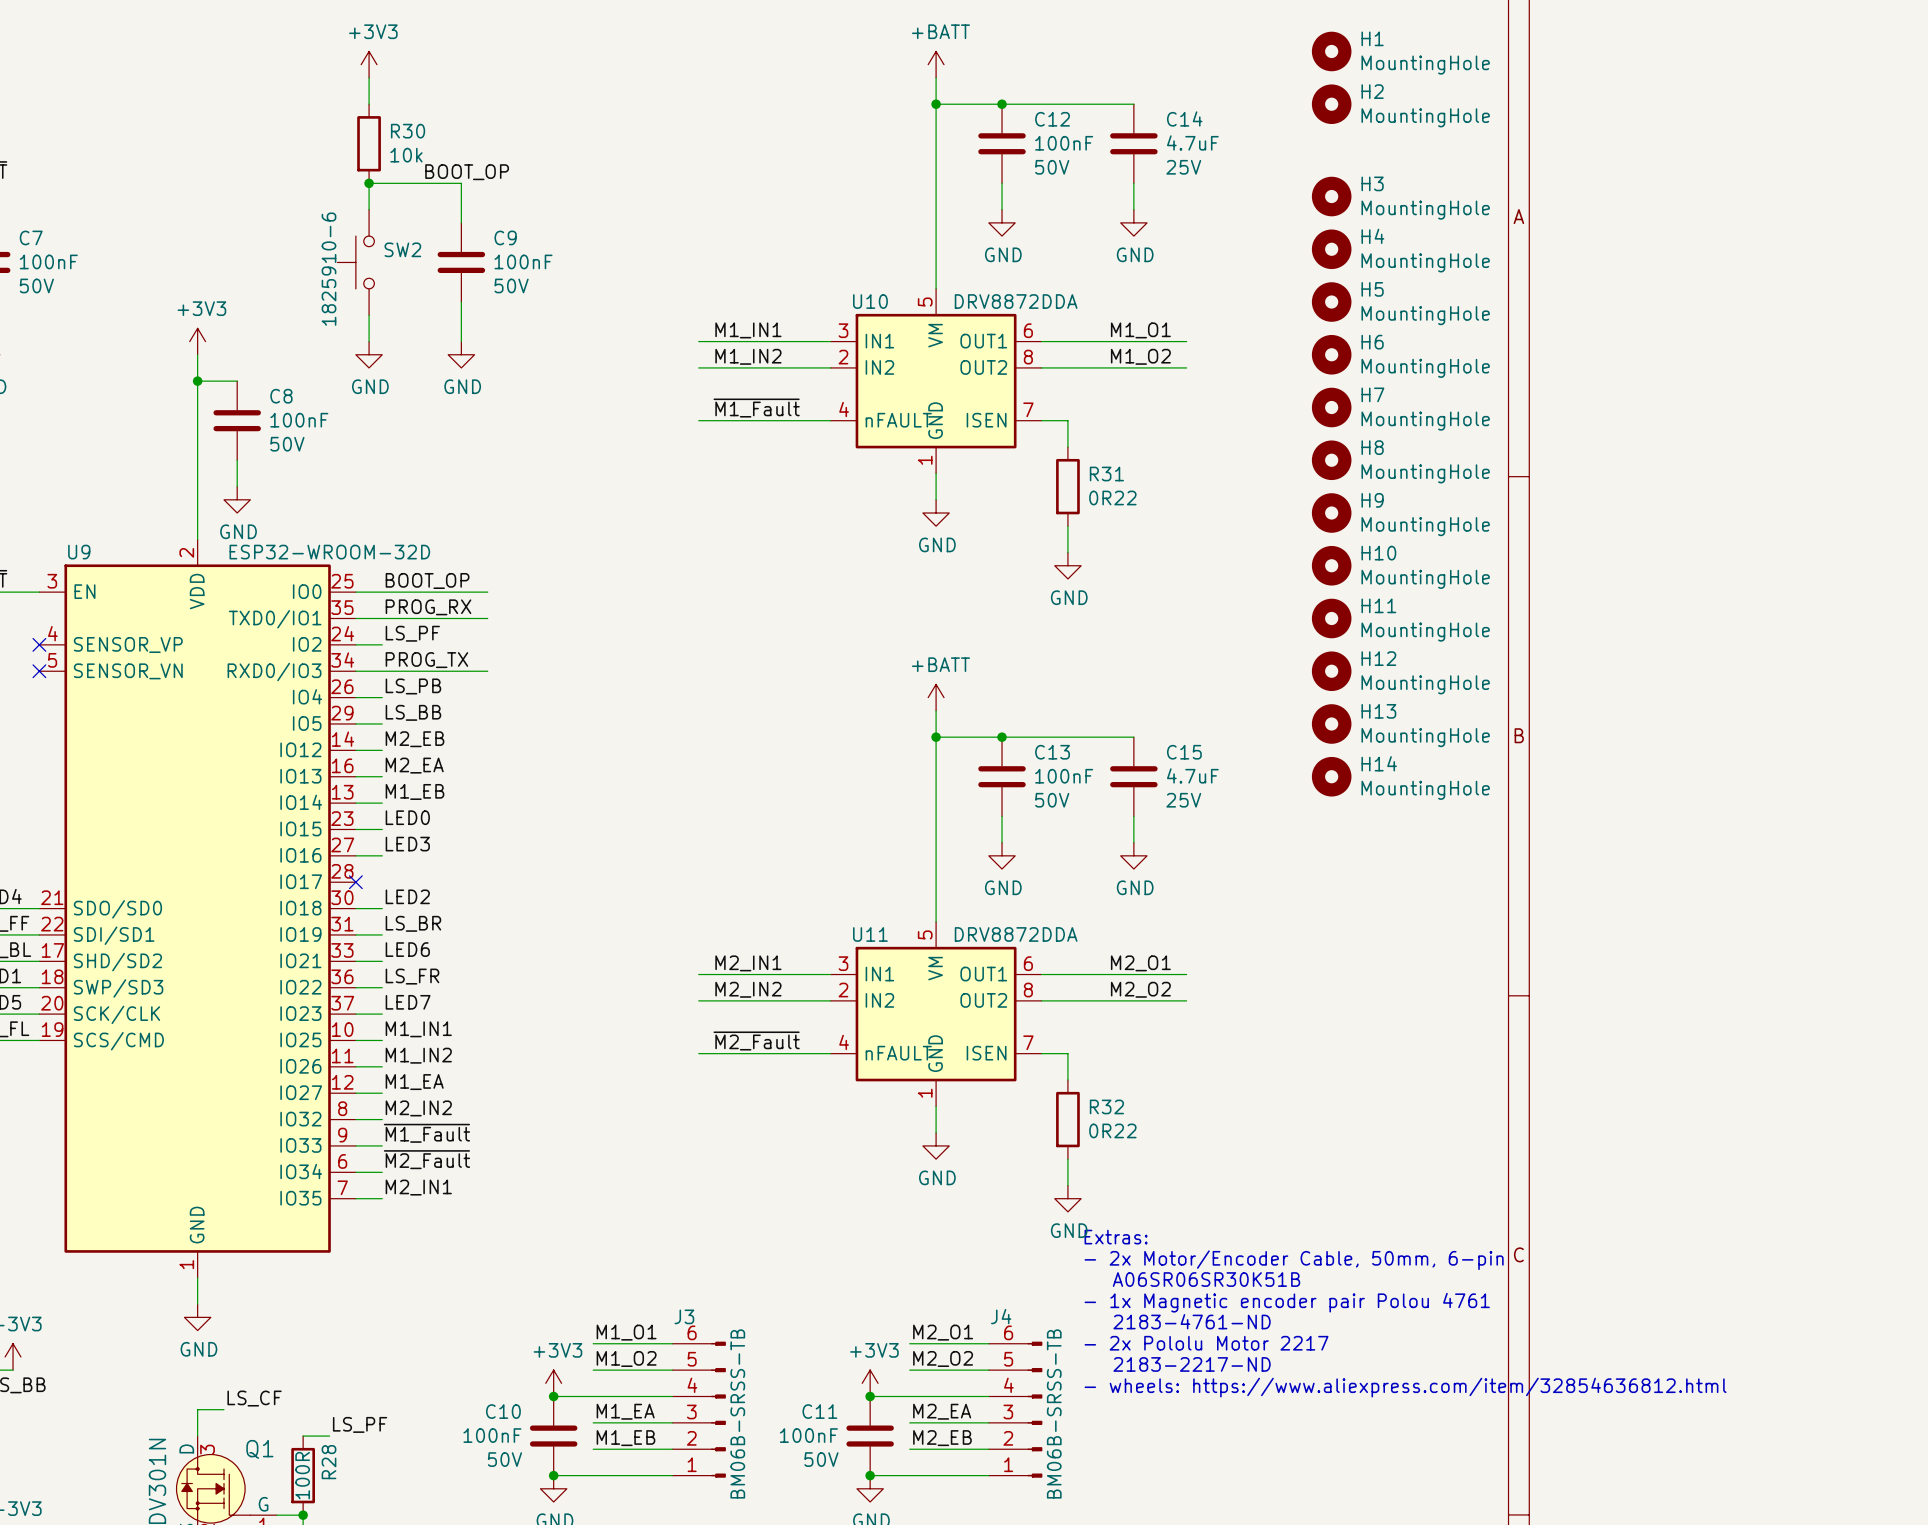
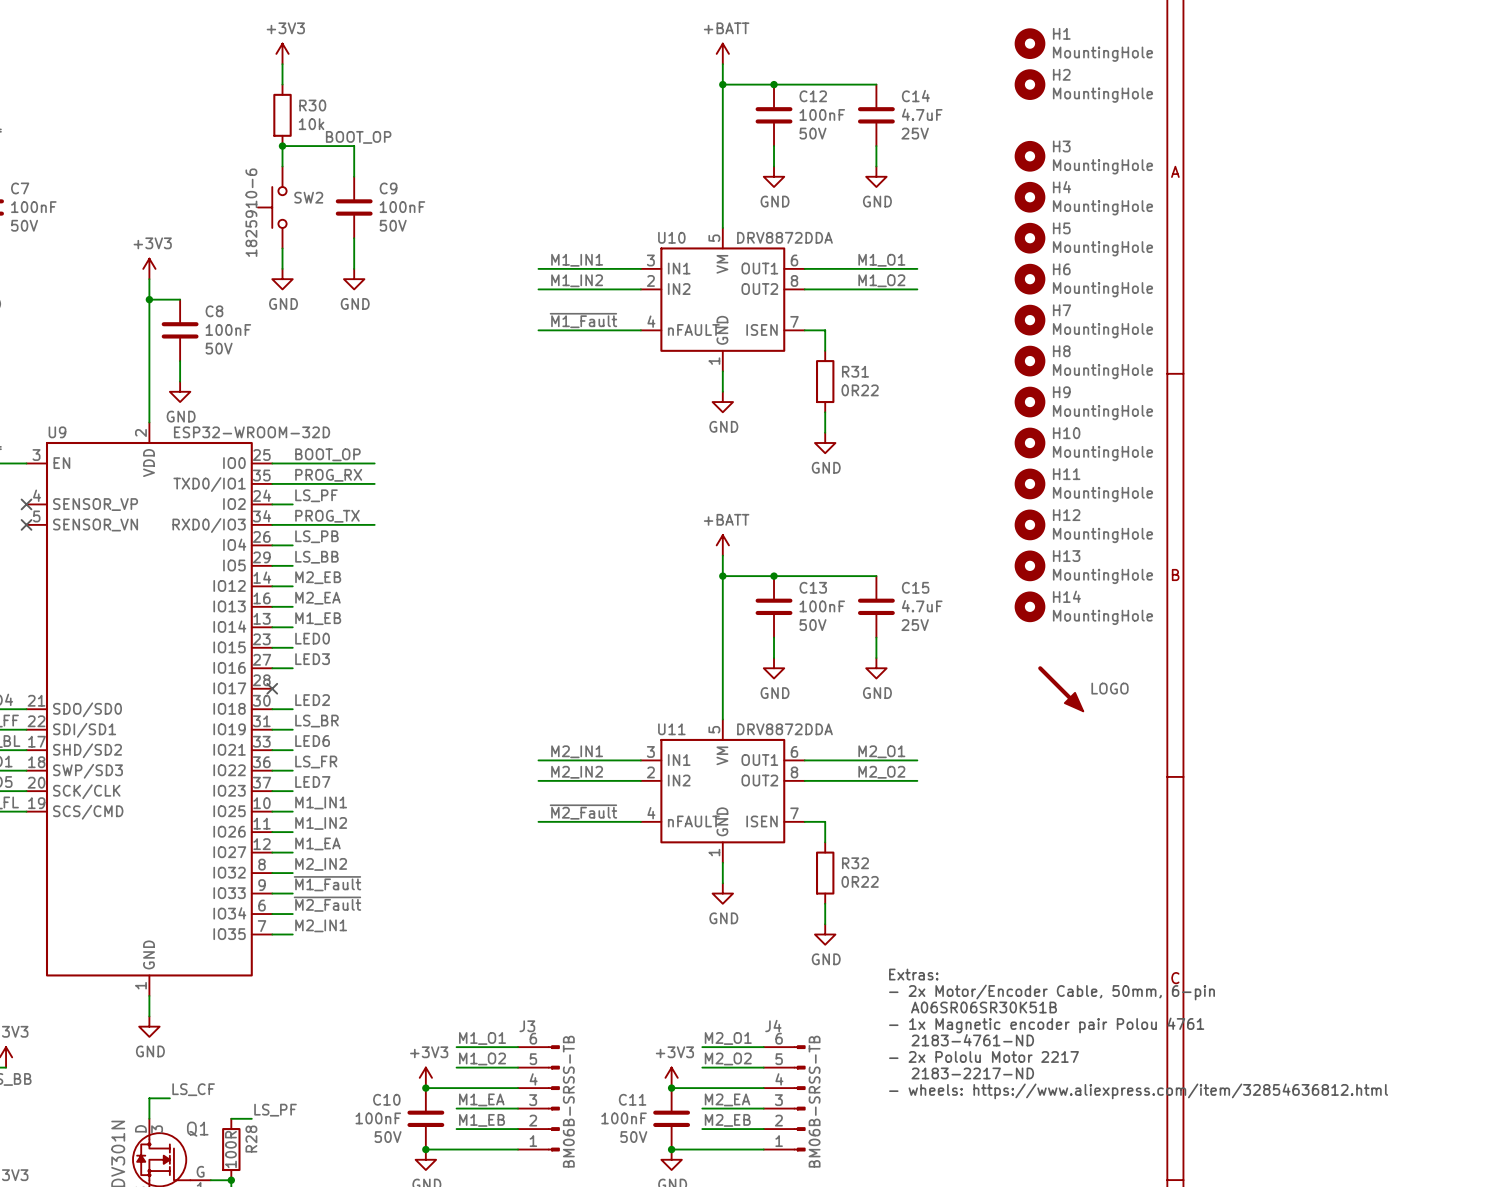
part: none -> LOGO (1060, 688)
text position: Extras: (1116, 1237) -> Extras: (913, 974)
text position: - 2x Motor/Encoder Cable, 50mm, 6-pin (1294, 1260) -> - 2x Motor/Encoder Cable, 50mm, 6-pin (1052, 992)
text position: A06SR06SR30K51B (1206, 1279) -> A06SR06SR30K51B (983, 1007)
text position: - 1x Magnetic encoder pair Polou 4761 (1287, 1302) -> - 1x Magnetic encoder pair Polou 4761 (1046, 1025)
text position: 2183-4761-ND (1192, 1321) -> 2183-4761-ND (972, 1040)
text position: - 2x Pololu Motor 2217 (1206, 1343) -> - 2x Pololu Motor 2217 (983, 1056)
text position: 2183-2217-ND (1192, 1364) -> 2183-2217-ND (972, 1073)
text position: - wheels: https://www.aliexpress.com/item/32854636812.html (1405, 1387) -> - wheels: https://www.aliexpress.com/item/32854636812.html (1138, 1091)

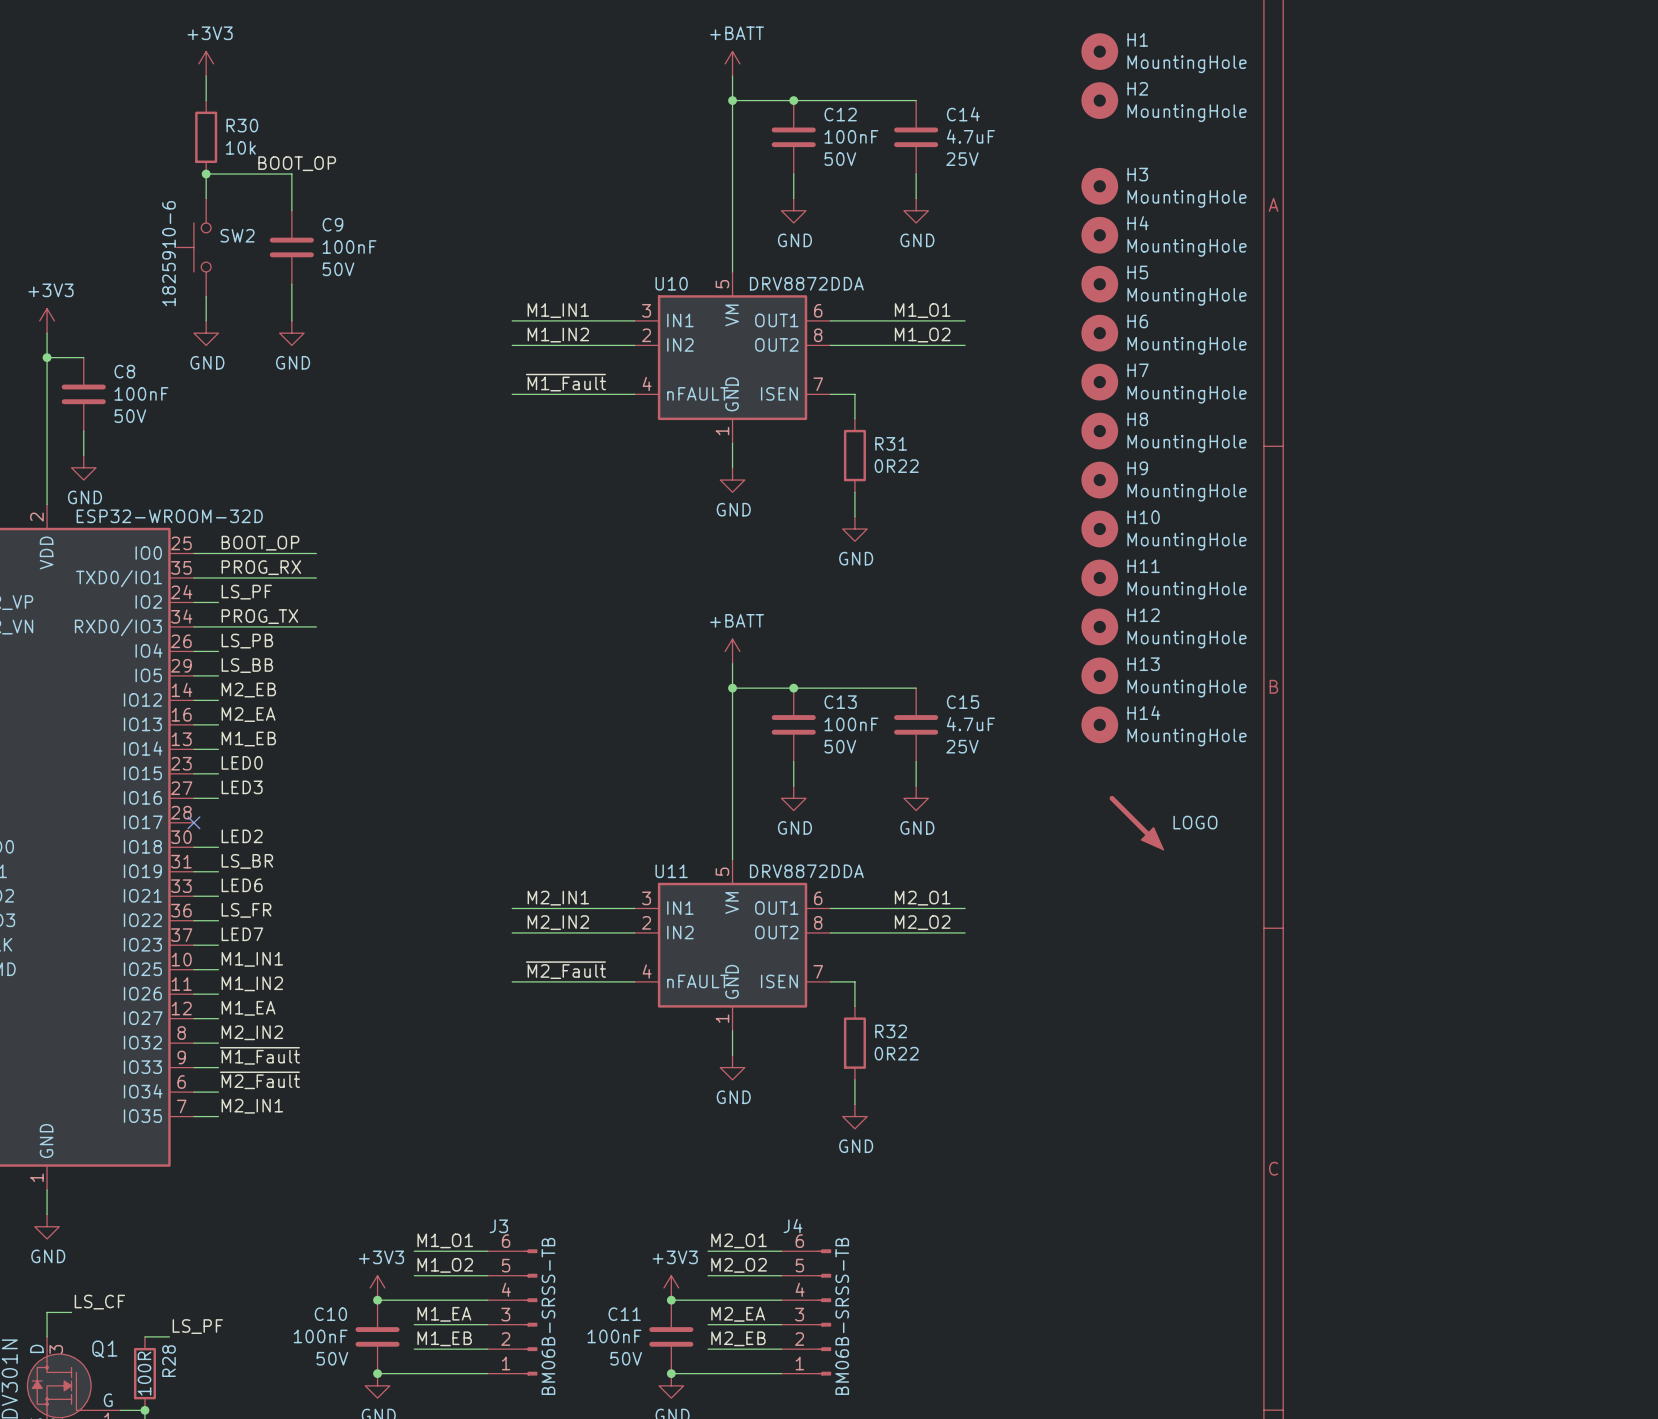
text: Extras: (913, 974) -> none
text: - 2x Motor/Encoder Cable, 50mm, 6-pin (1052, 992) -> none
text: A06SR06SR30K51B (983, 1007) -> none
text: - 1x Magnetic encoder pair Polou 4761 (1046, 1025) -> none
text: 2183-4761-ND (972, 1040) -> none
text: - 2x Pololu Motor 2217 (983, 1056) -> none
text: 2183-2217-ND (972, 1073) -> none
text: - wheels: https://www.aliexpress.com/item/32854636812.html (1138, 1091) -> none

